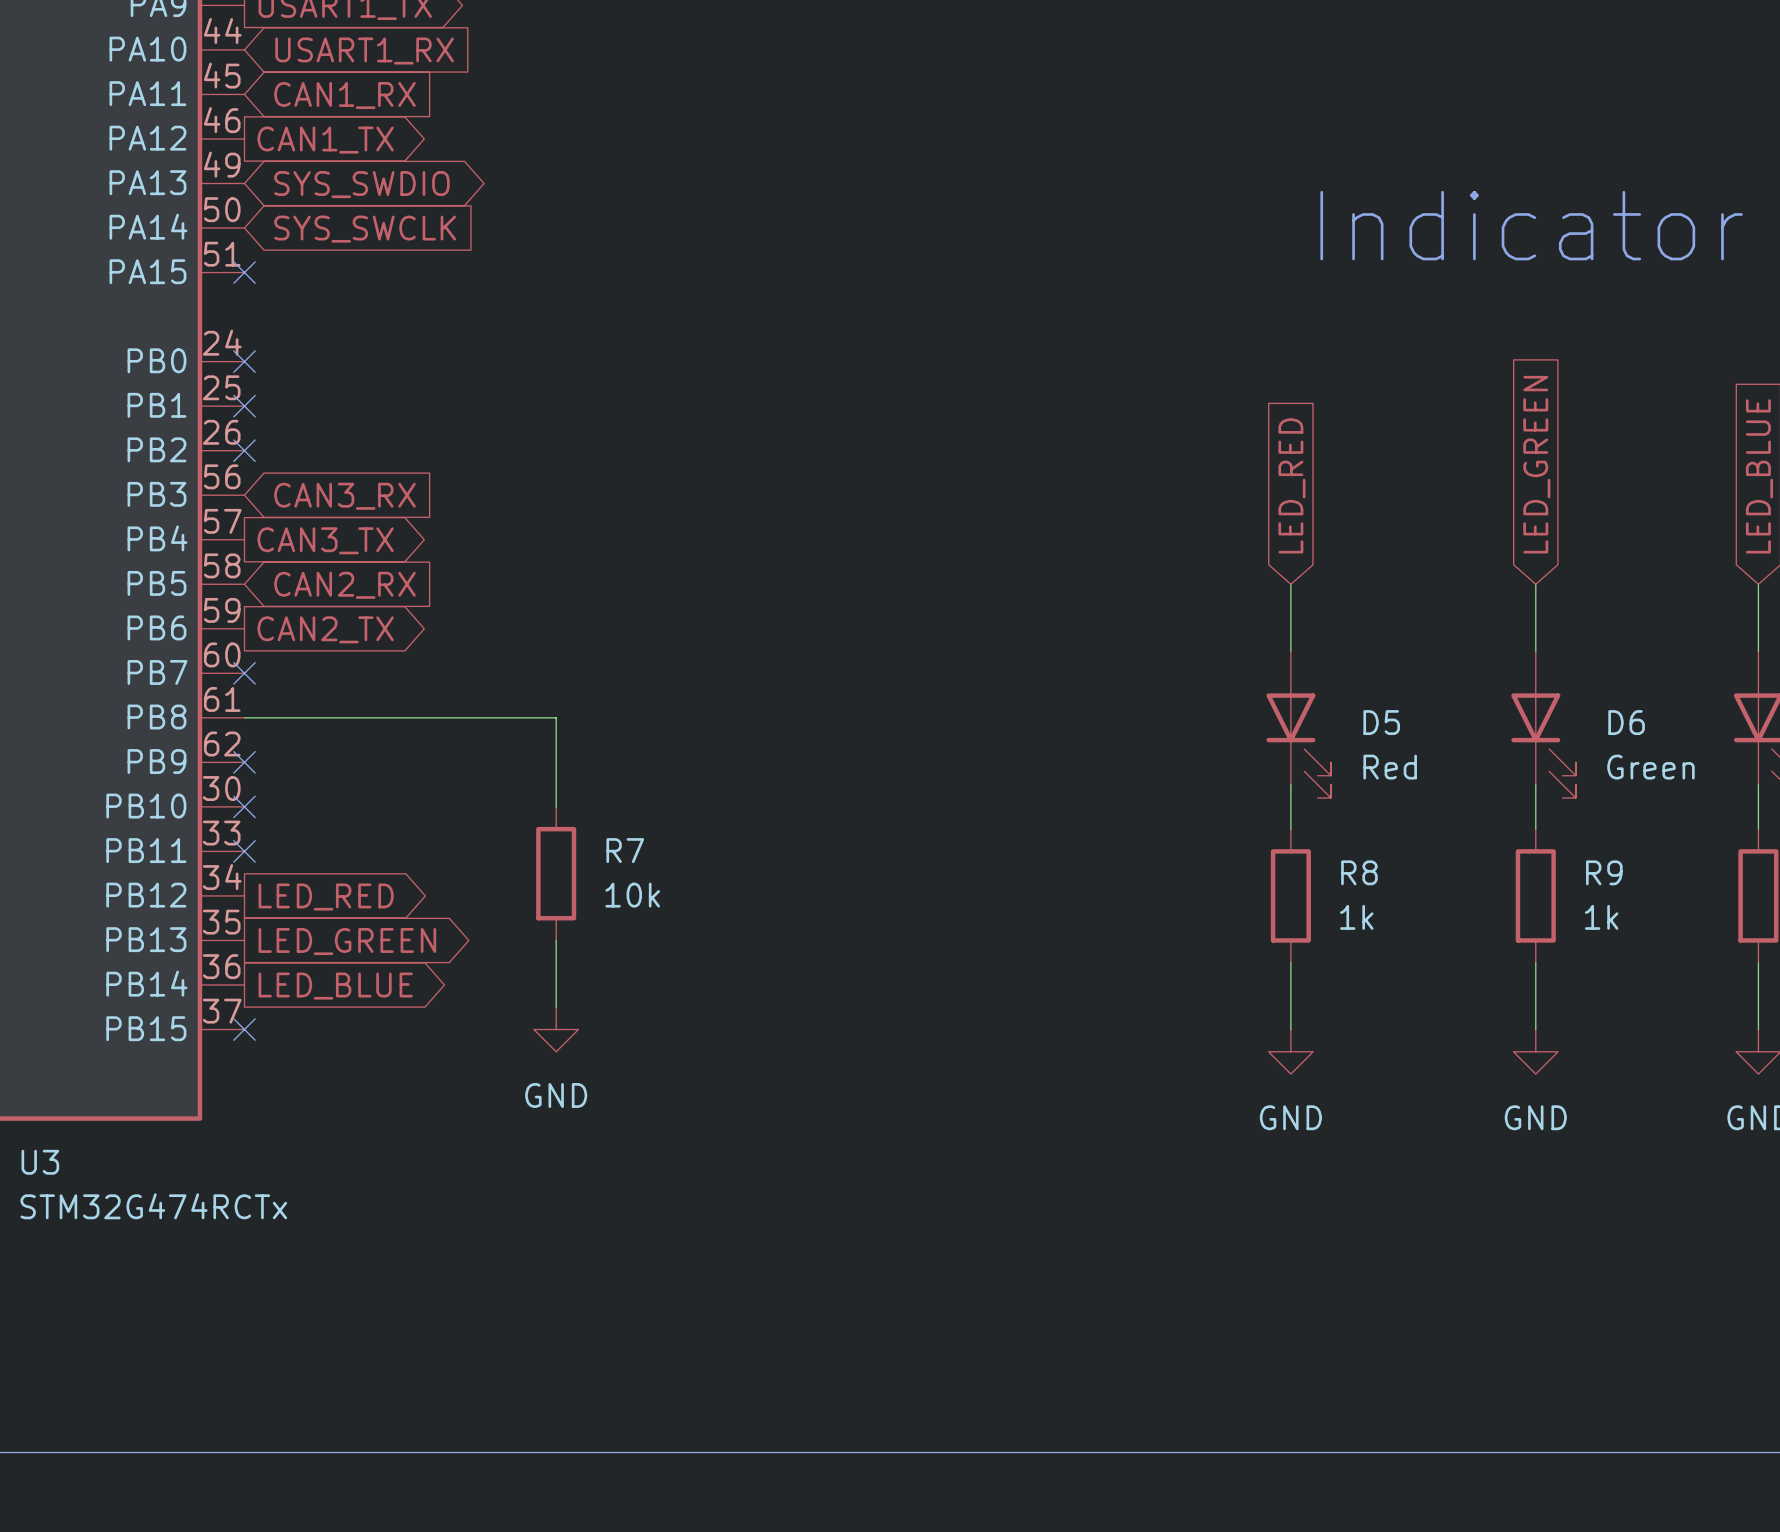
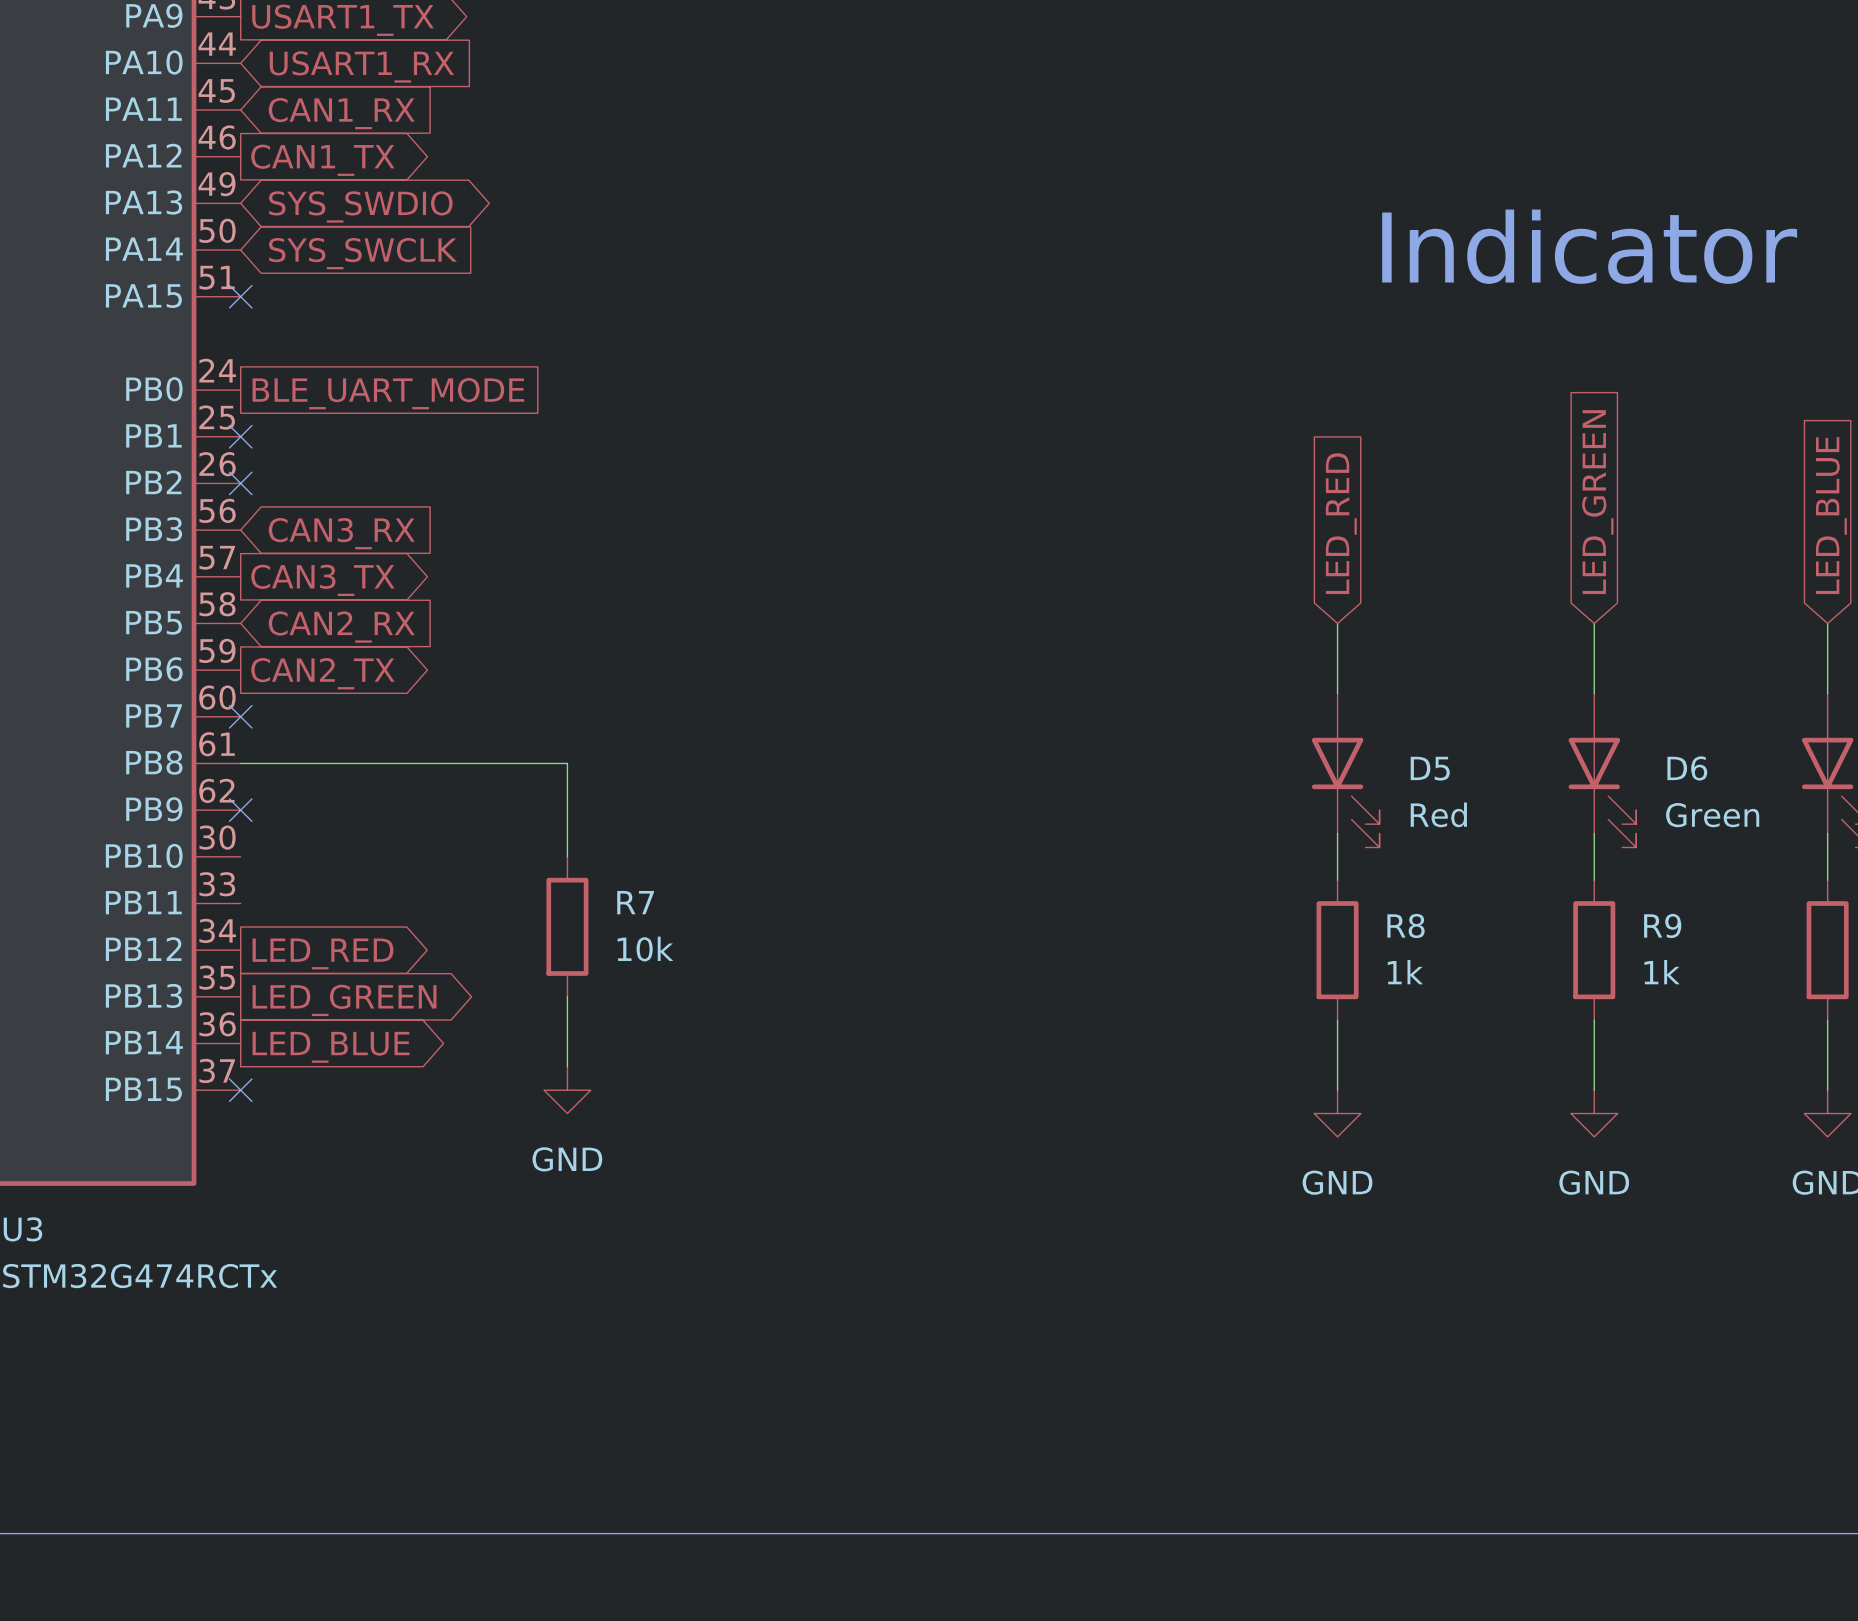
no-connect mark: (244, 361) -> none
global label: none -> BLE_UART_MODE (388, 393)
no-connect mark: (244, 806) -> none
no-connect mark: (244, 851) -> none

